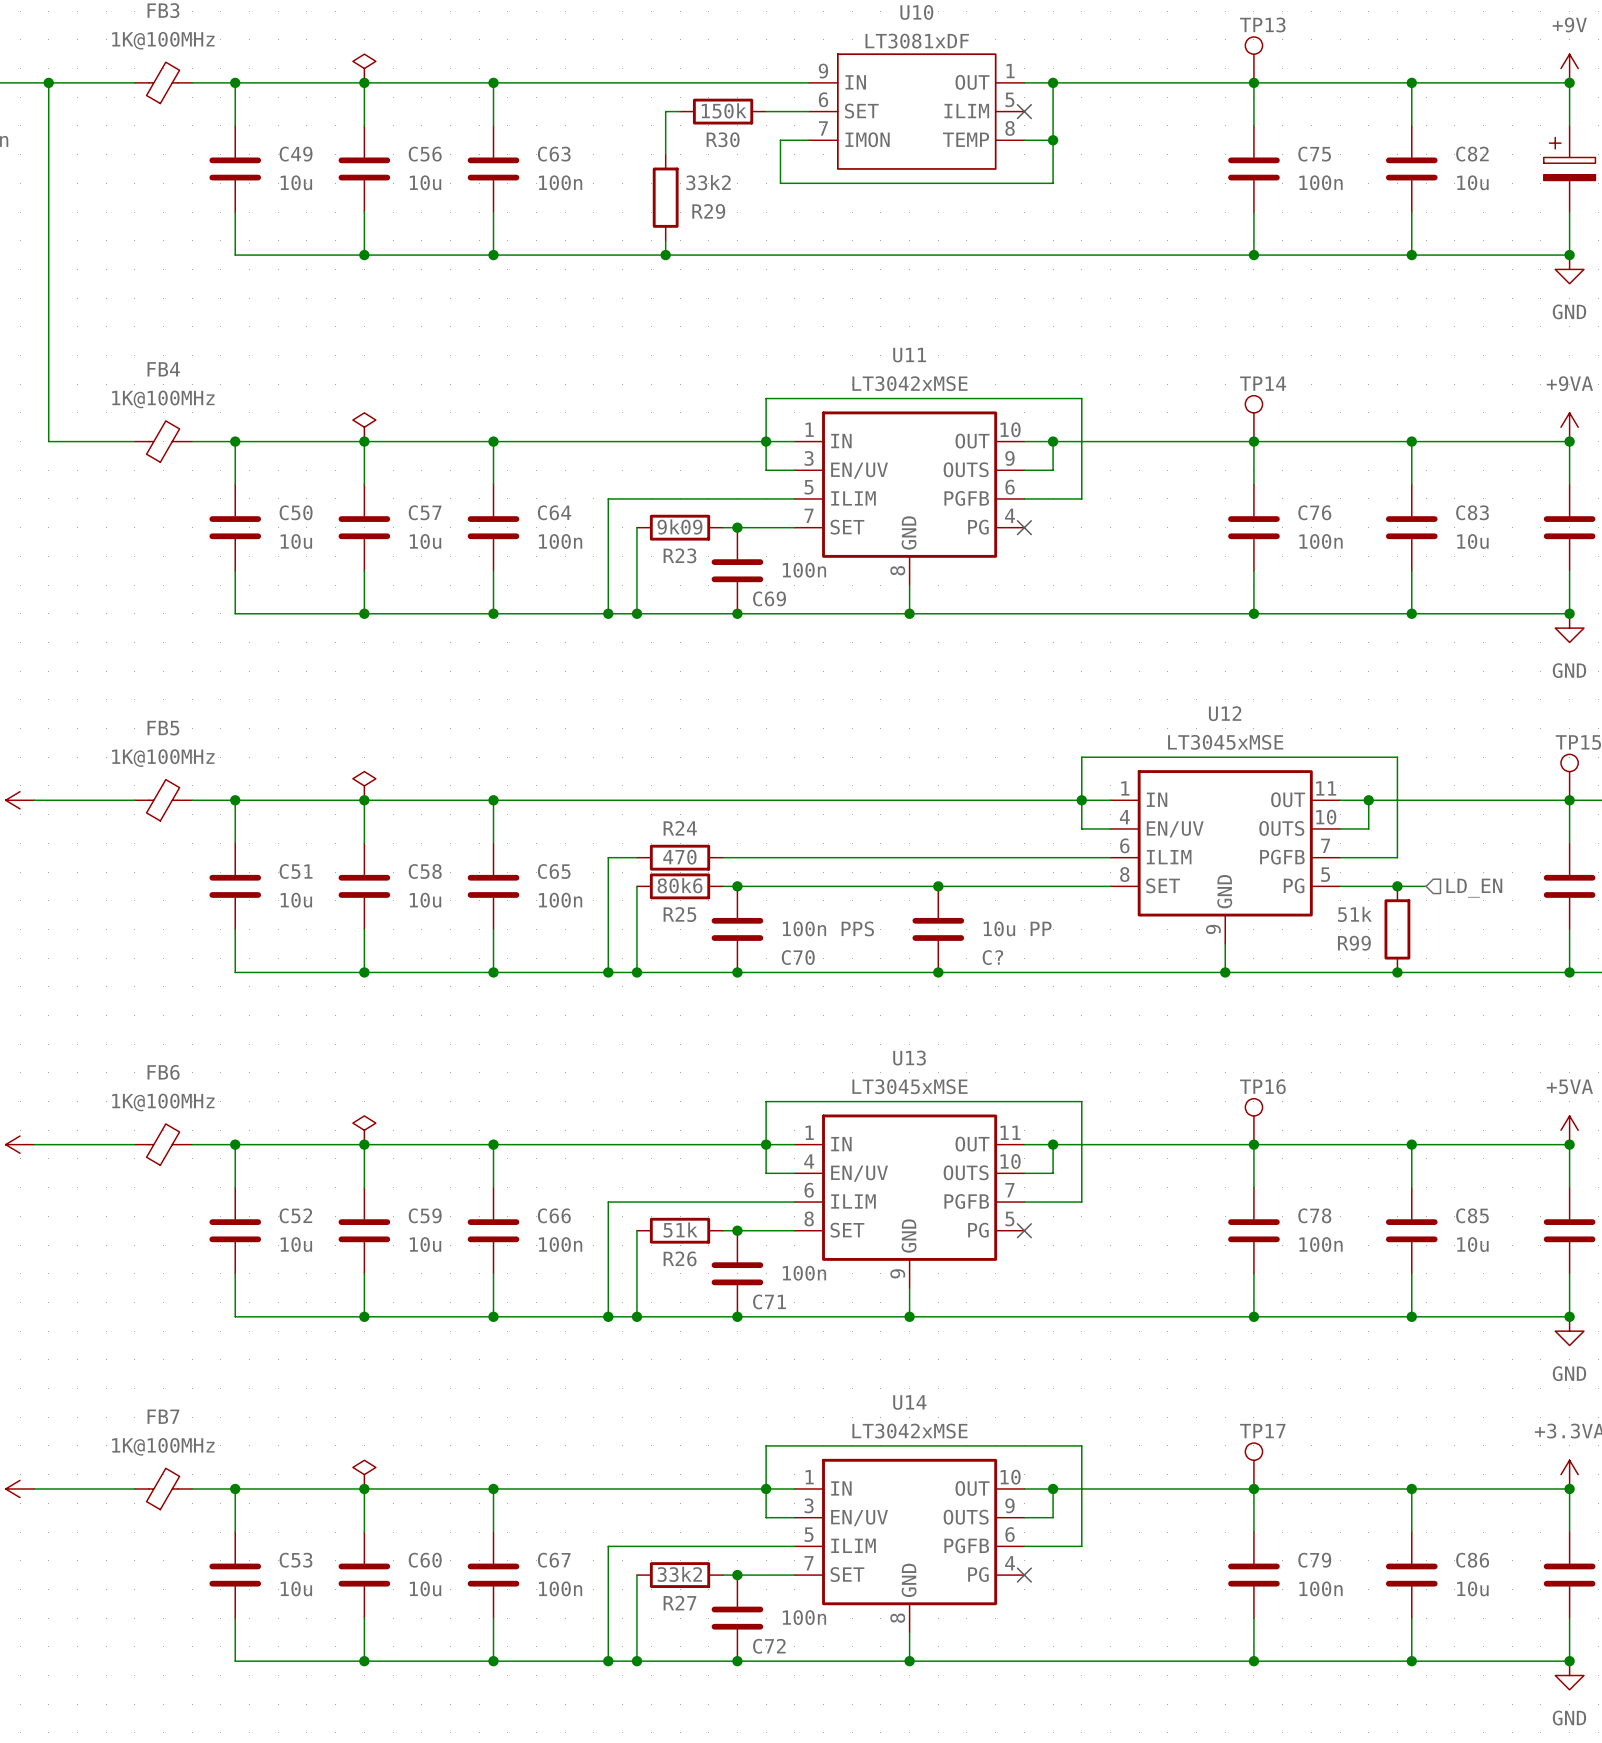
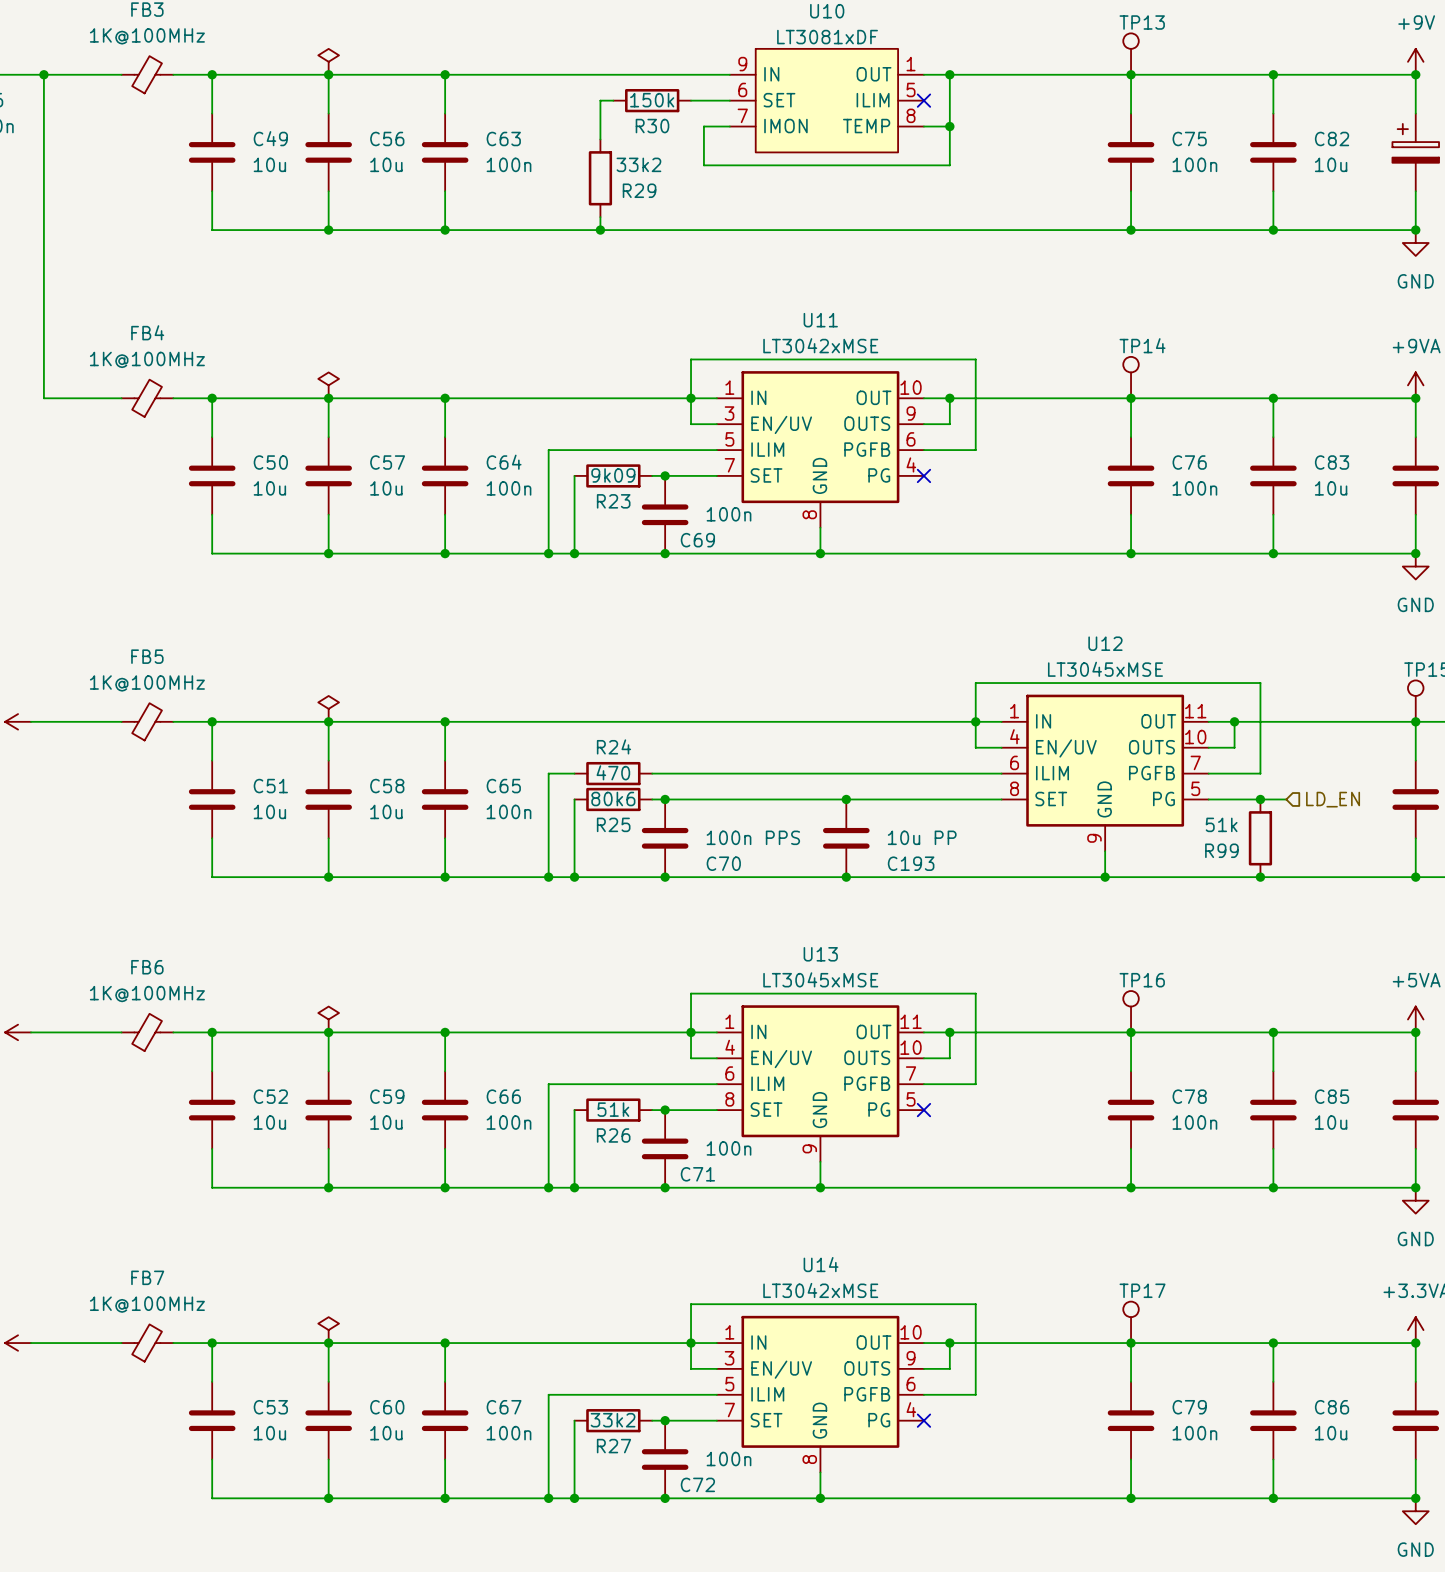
C? name: C? (992, 957) -> C193 (911, 863)

